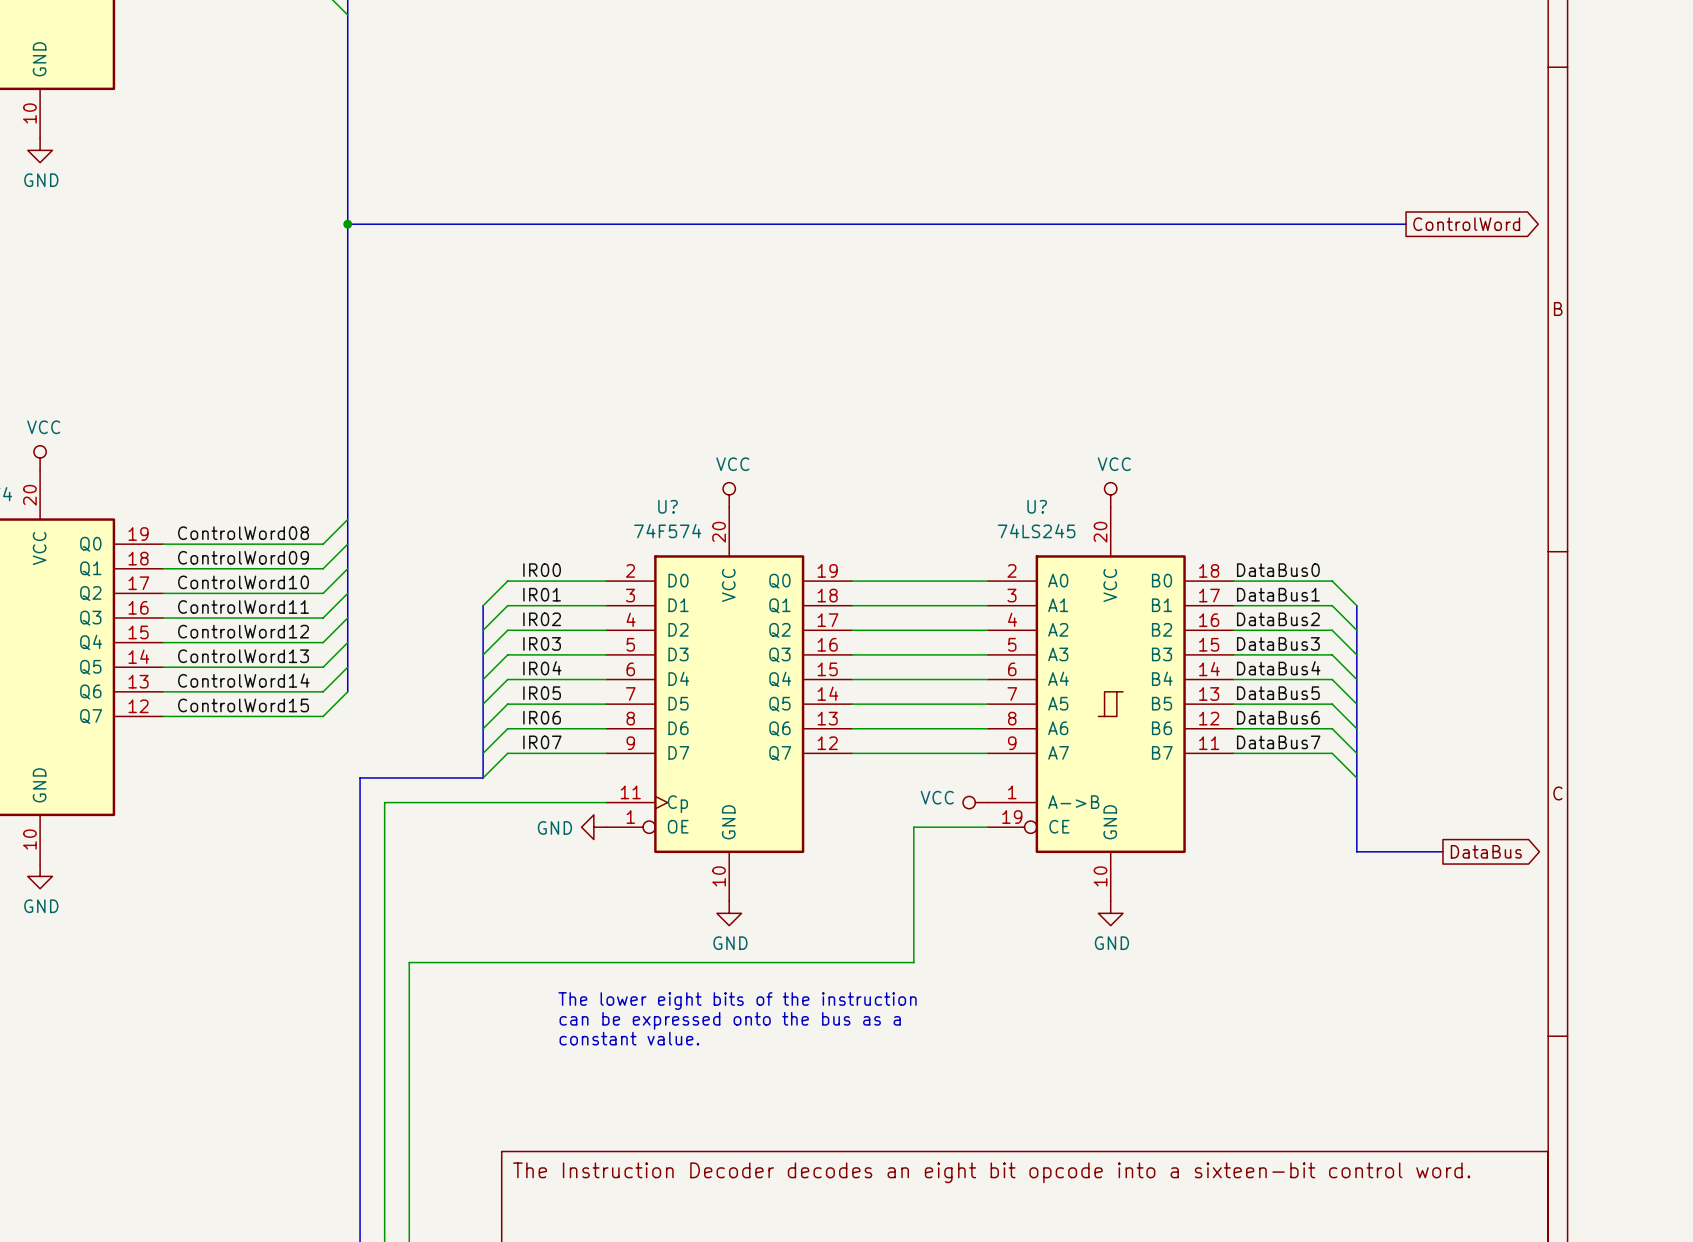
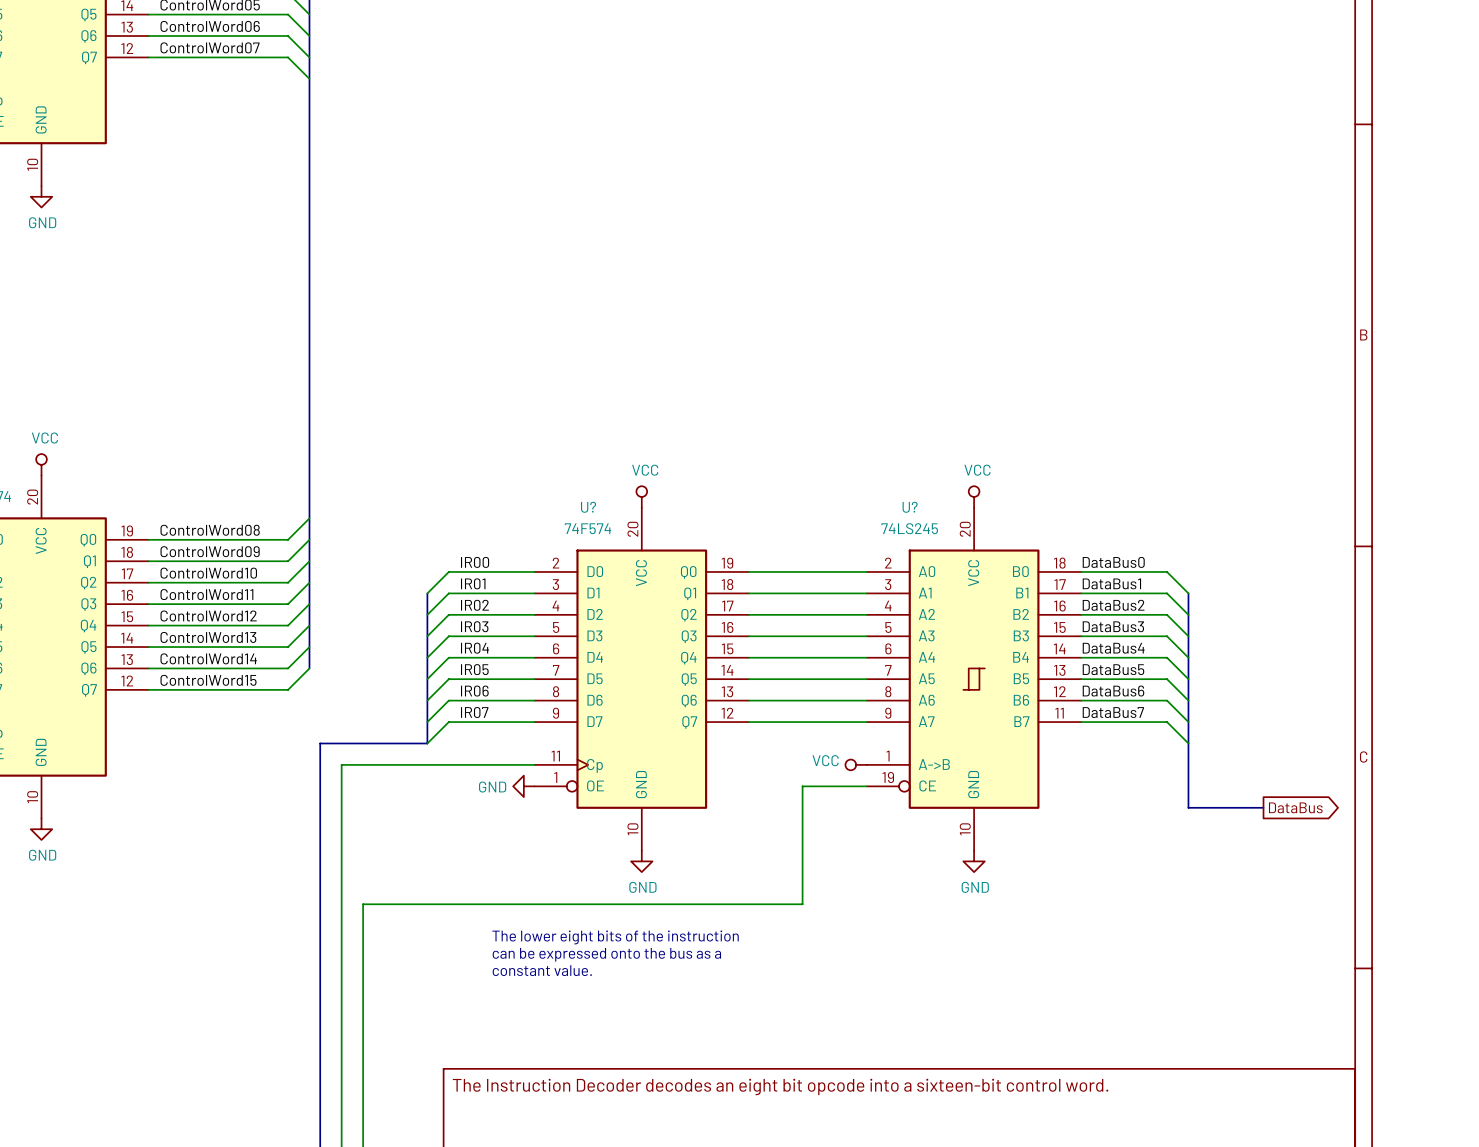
bus: (347, 224) (1406, 224) -> none
junction: (347, 224) -> none
global label: ControlWord (1466, 224) -> none

